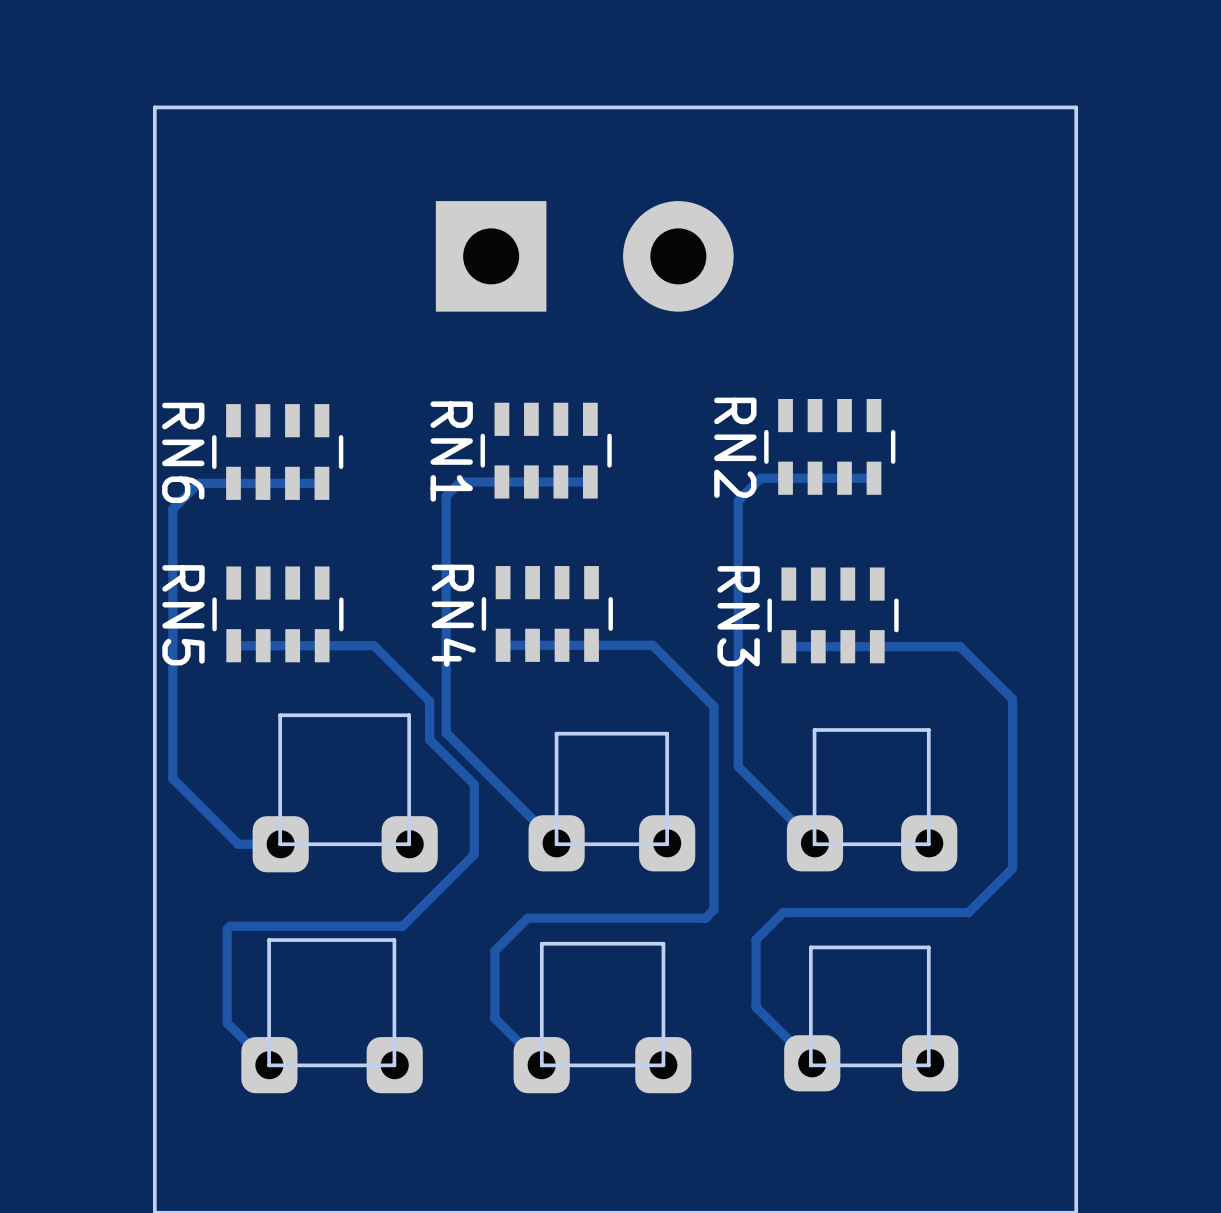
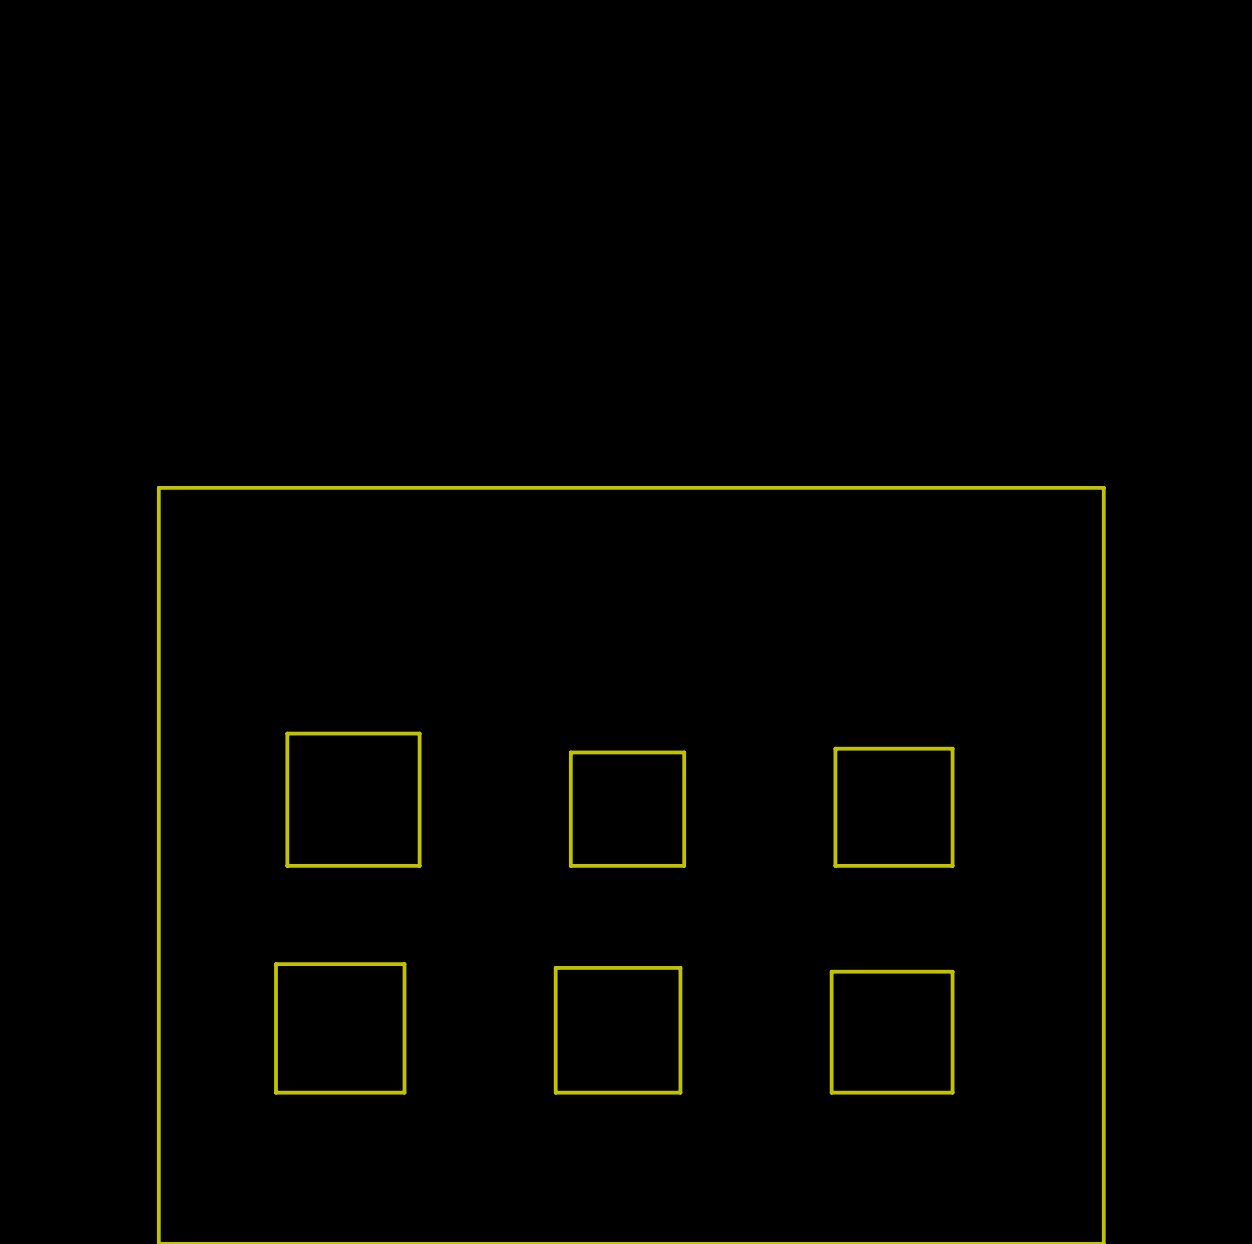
part: (584, 256) -> none
RN2: (829, 446) -> none
RN1: (546, 450) -> none
RN6: (277, 452) -> none
board edge: (1076, 475) (1076, 107) (154, 107) (154, 475) -> (1103, 487) (158, 487)
track: (874, 478) (760, 478) (738, 500) (738, 766) (800, 829) -> none
track: (590, 481) (460, 481) (446, 496) (446, 732) (542, 829) -> none
track: (321, 483) (198, 483) (172, 509) (172, 778) (238, 844) (266, 844) -> none
RN4: (547, 613) -> none
RN5: (277, 614) -> none
RN3: (833, 615) -> none
track: (233, 645) (374, 645) (429, 701) (429, 739) (474, 784) (474, 854) (402, 926) (230, 926) (227, 929) (227, 1022) (255, 1051) -> none
track: (503, 645) (652, 645) (713, 706) (713, 909) (705, 918) (527, 918) (494, 950) (494, 1018) (527, 1051) (527, 1065) -> none
track: (788, 646) (960, 646) (1012, 699) (1012, 868) (968, 912) (783, 912) (756, 939) (756, 1007) (797, 1048) -> none
part: (611, 843) -> none
part: (872, 843) -> none
part: (345, 844) -> none
part: (871, 1063) -> none
part: (332, 1065) -> none
part: (602, 1065) -> none

